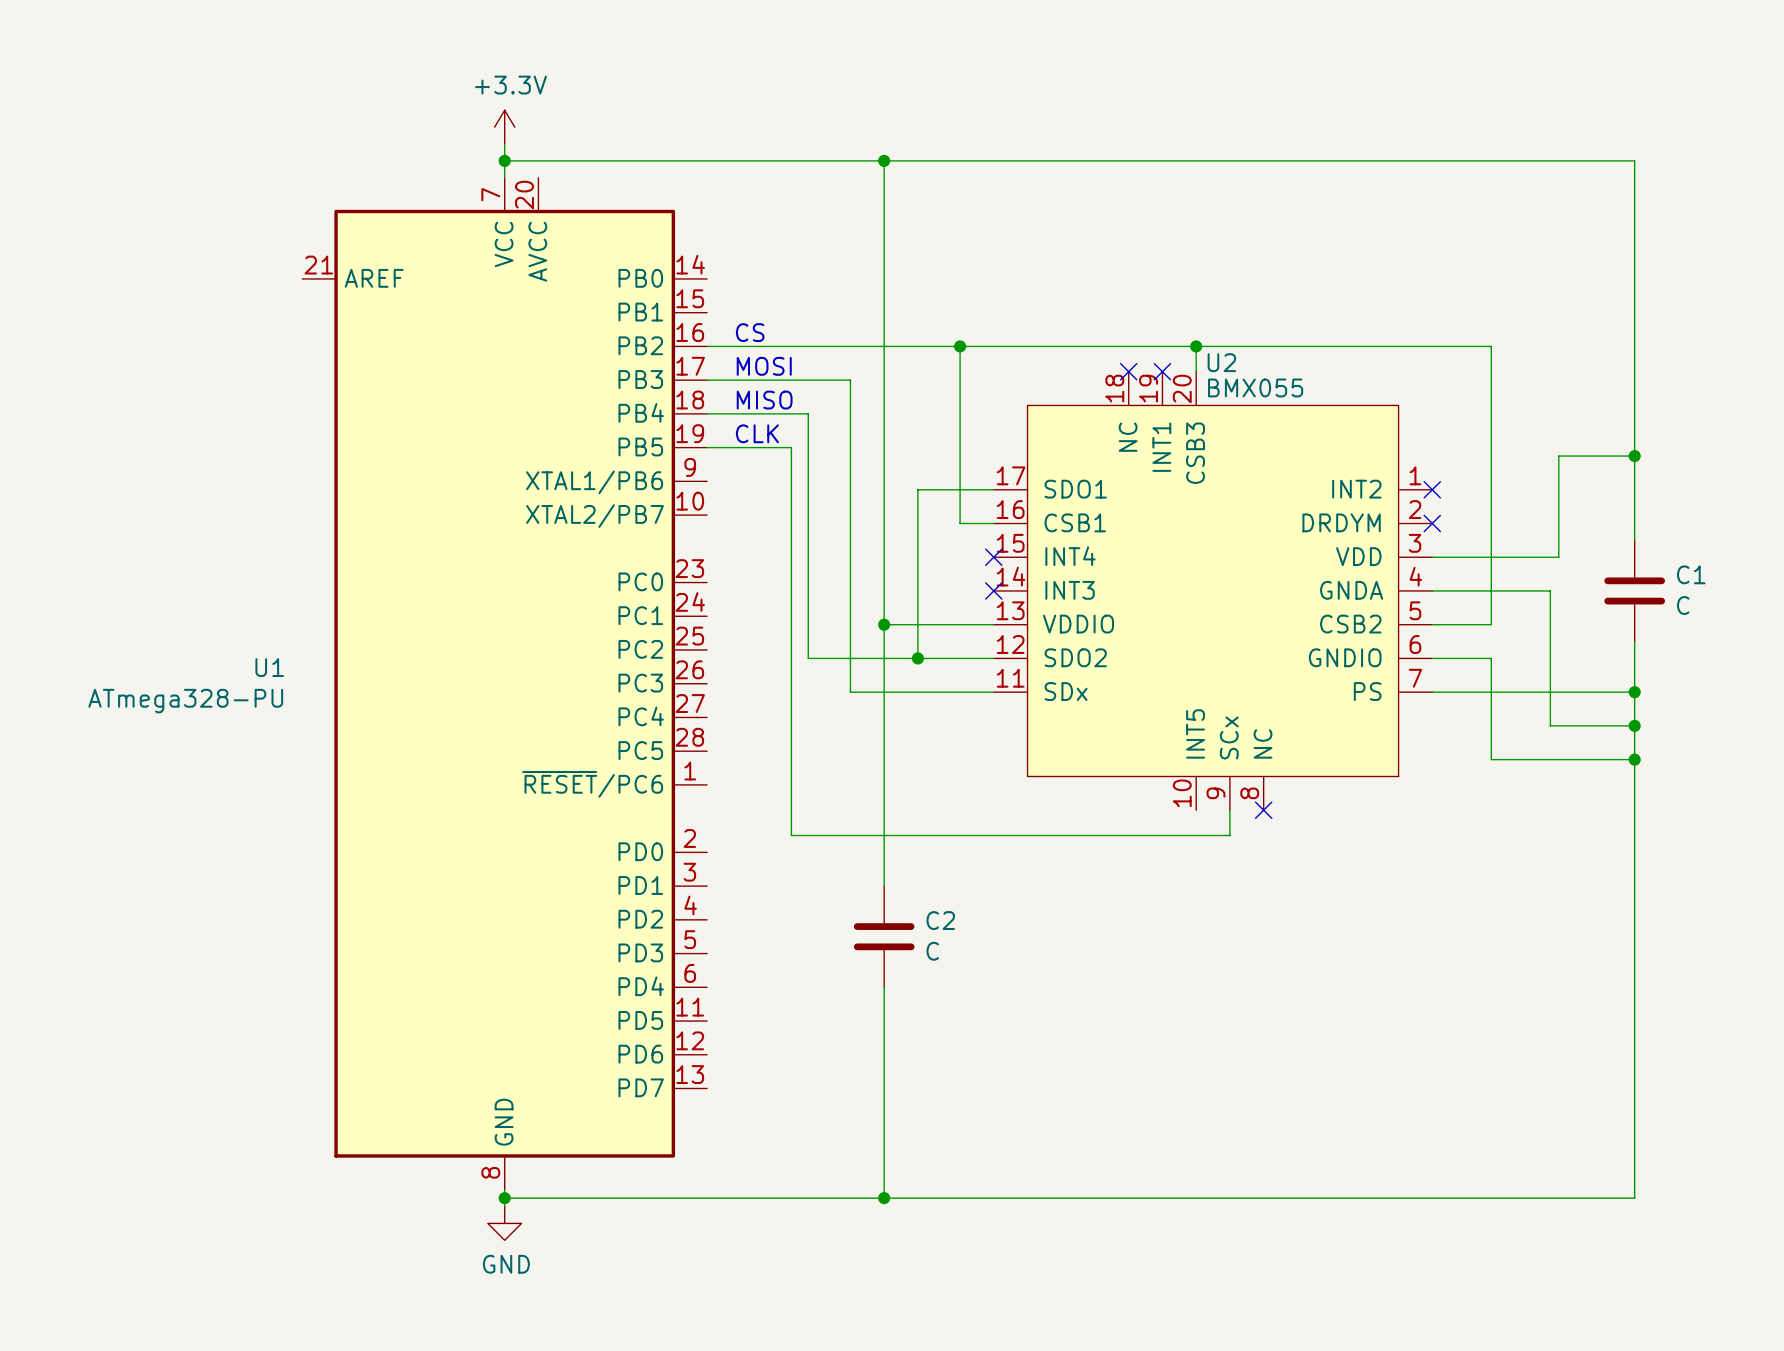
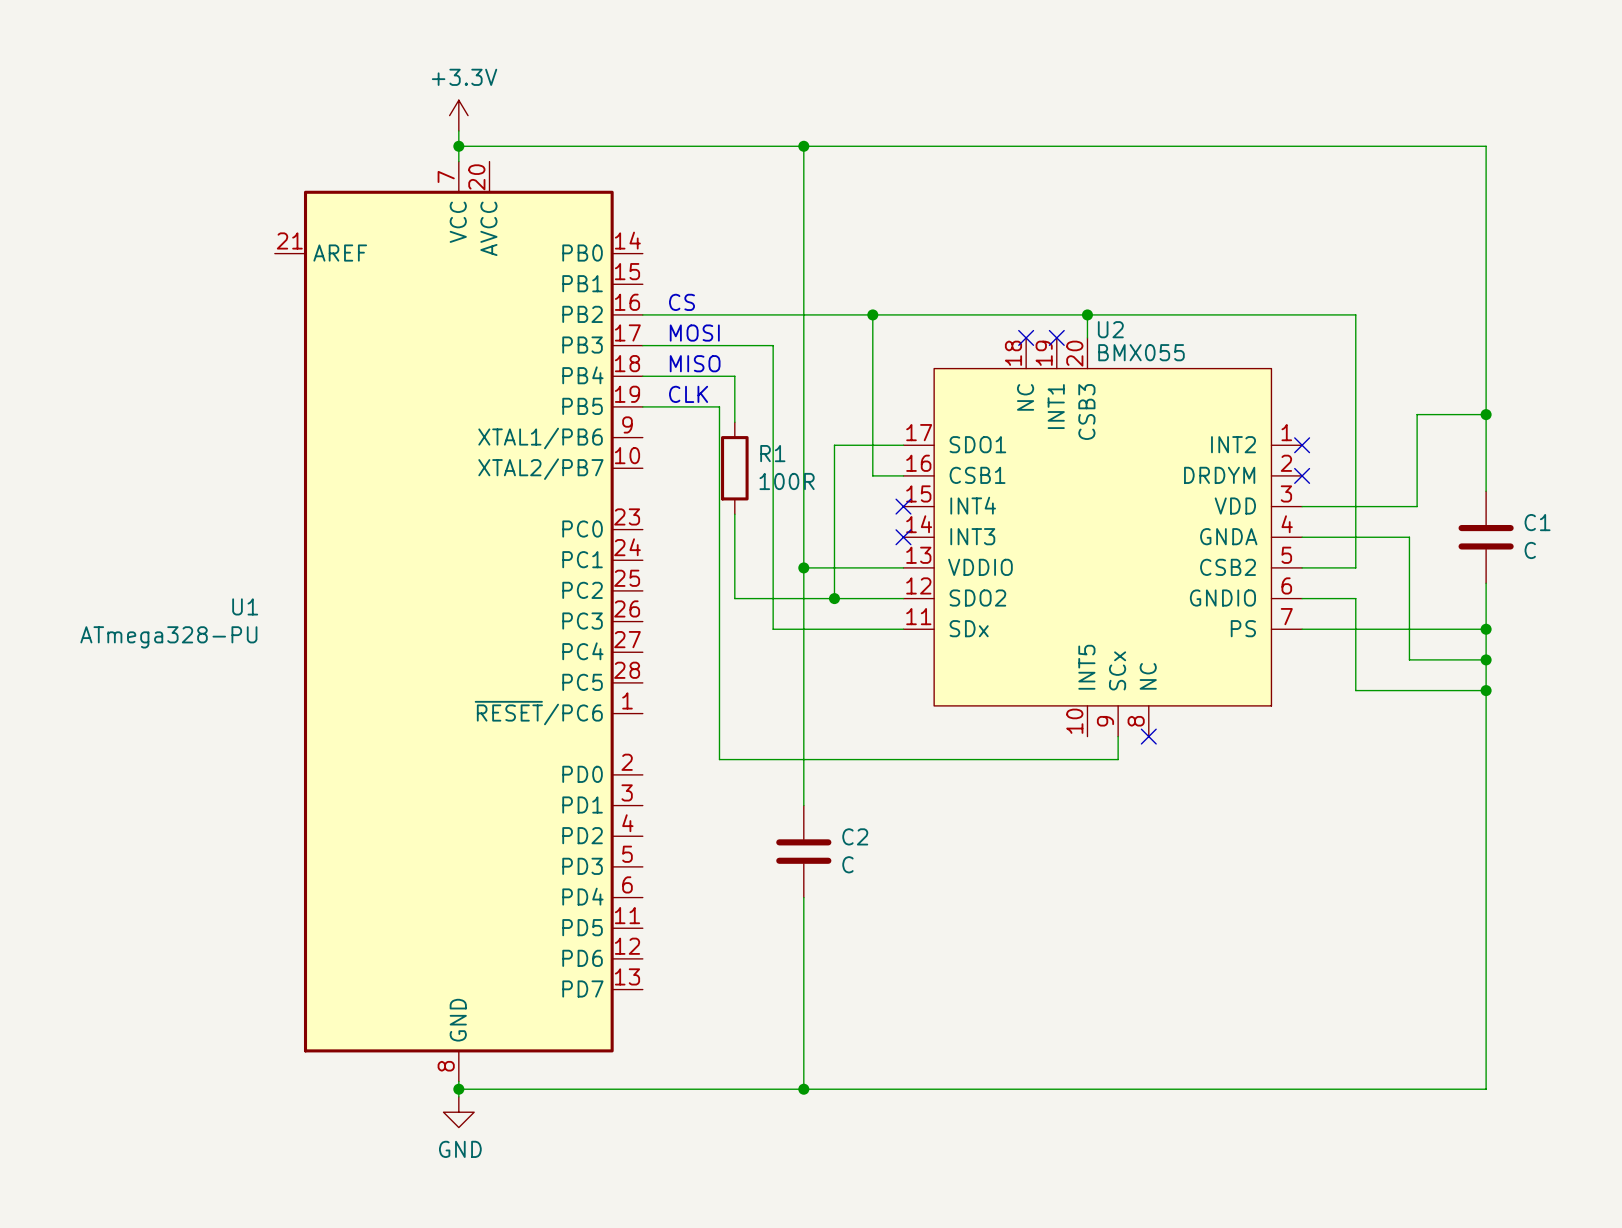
wire: (808, 464) (808, 565) -> none
R1: none -> 100R (734, 468)

